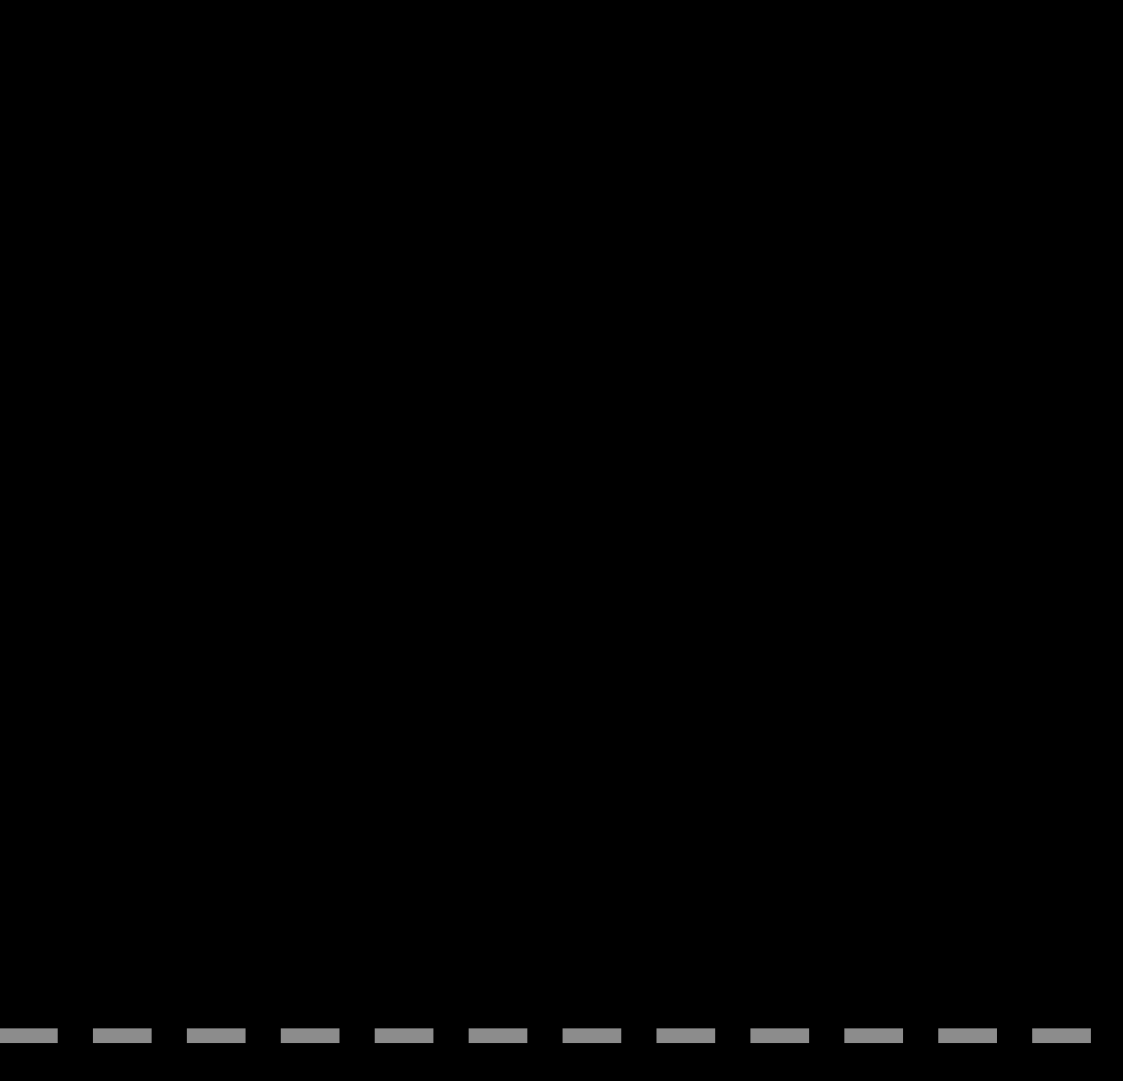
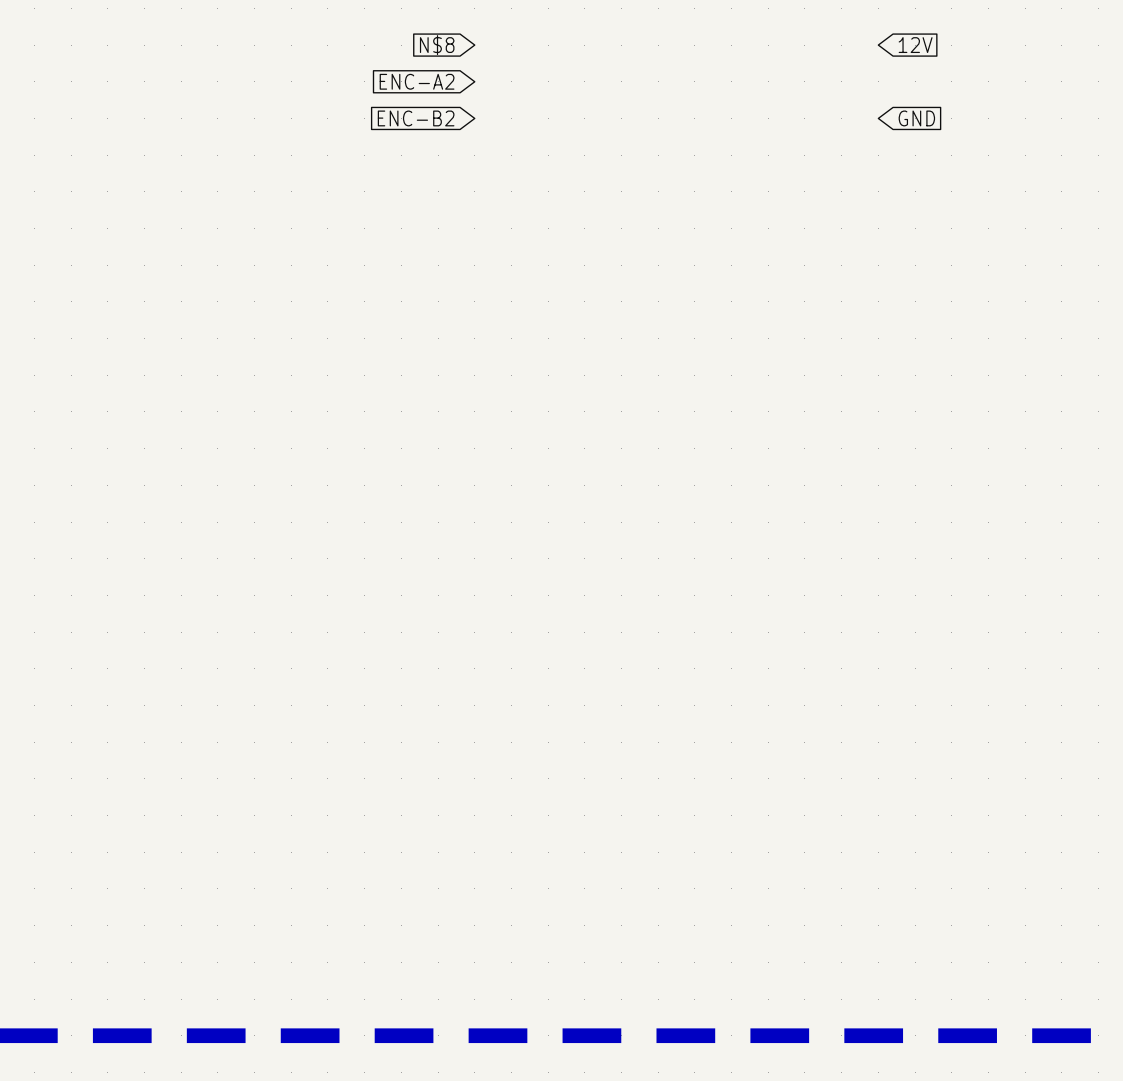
global label: none -> 12V (915, 45)
global label: none -> N$8 (437, 45)
global label: none -> ENC-A2 (417, 81)
global label: none -> ENC-B2 (416, 118)
global label: none -> GND (916, 118)

